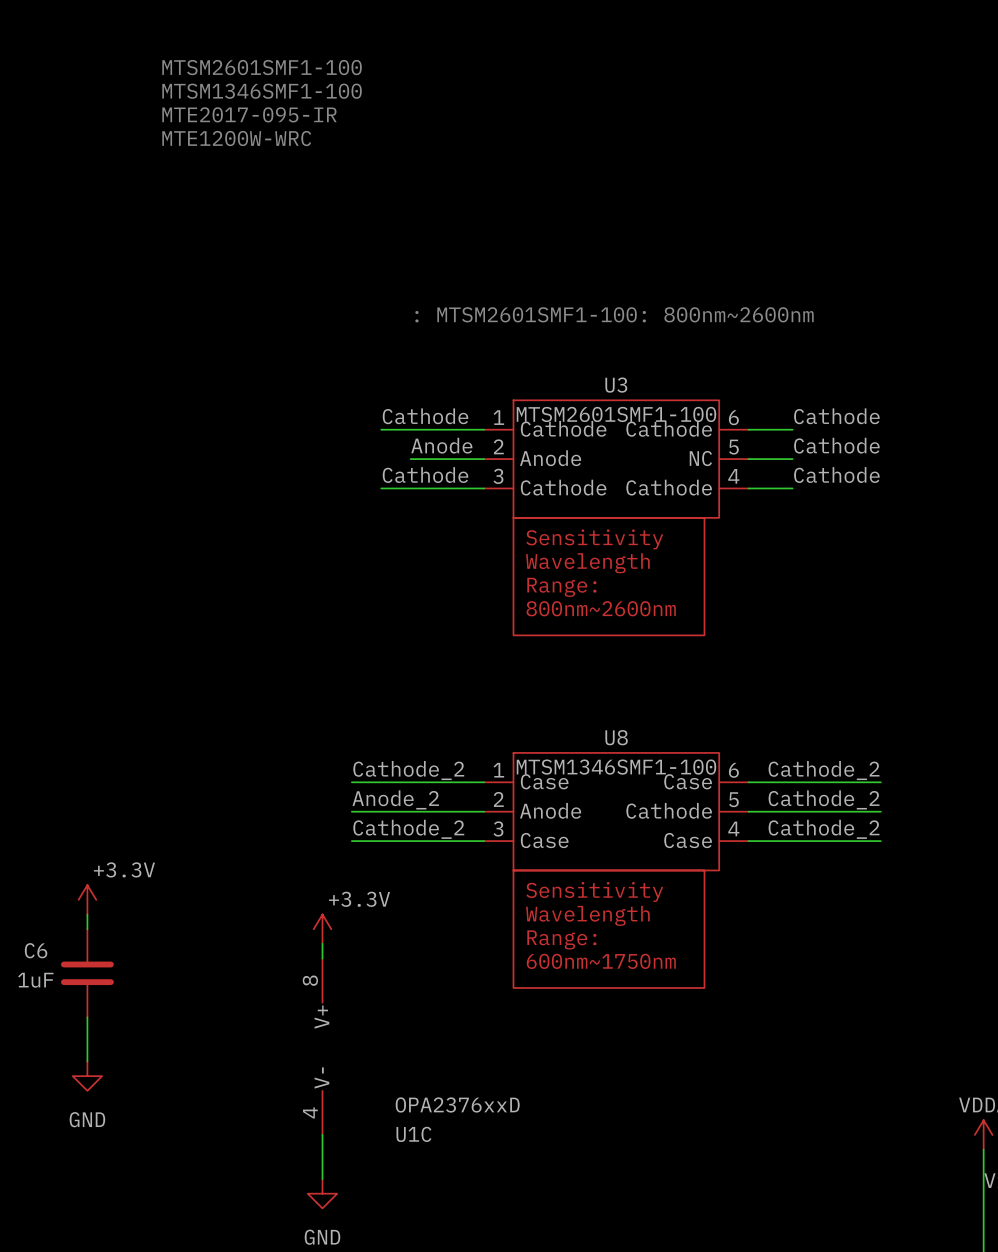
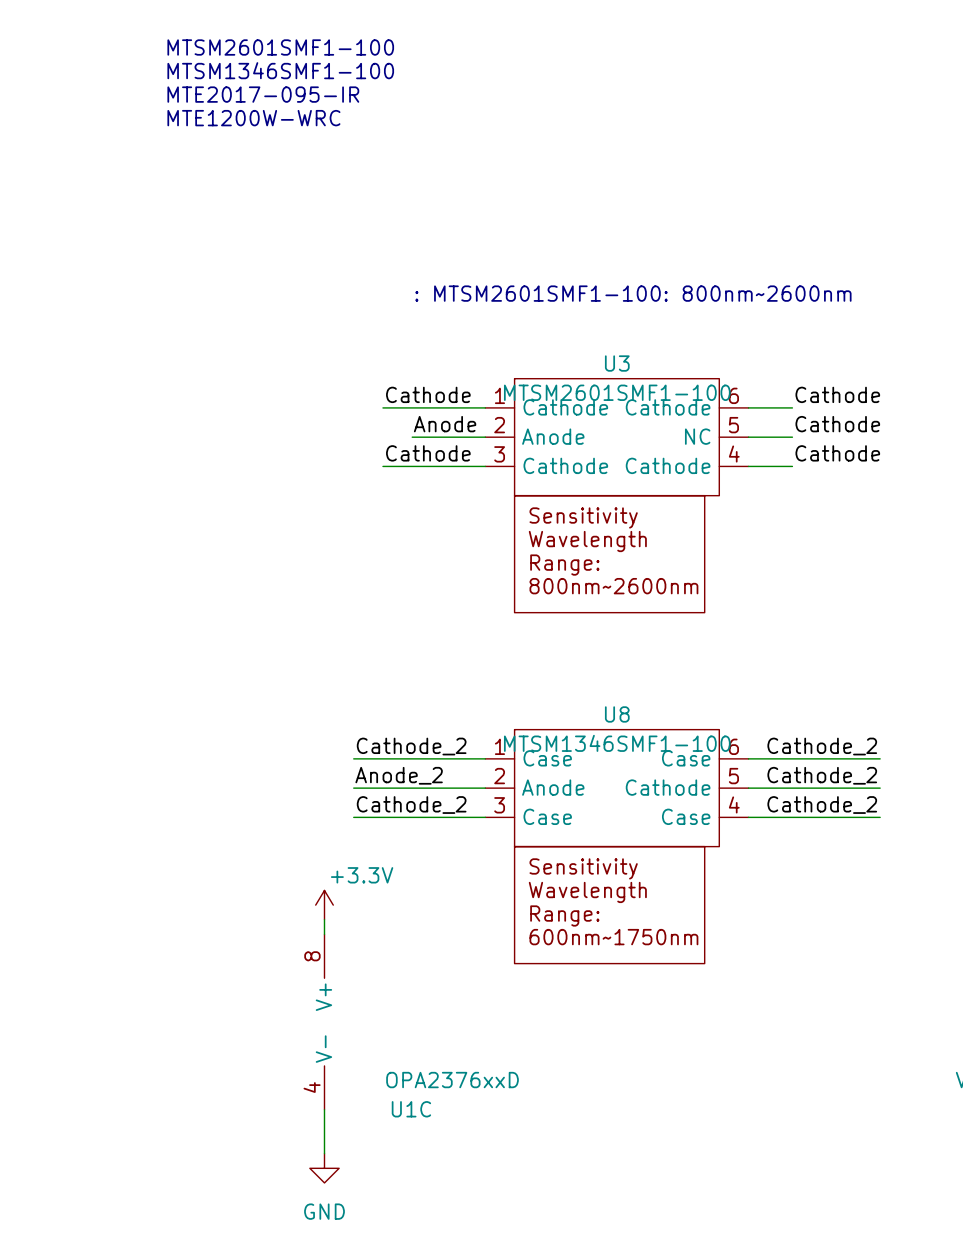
power symbol: +3.3V (87, 899) -> none
wire: (87, 914) (87, 929) -> none
C6: 1uF (87, 973) -> none
wire: (87, 1017) (87, 1061) -> none
power symbol: GND (87, 1076) -> none

